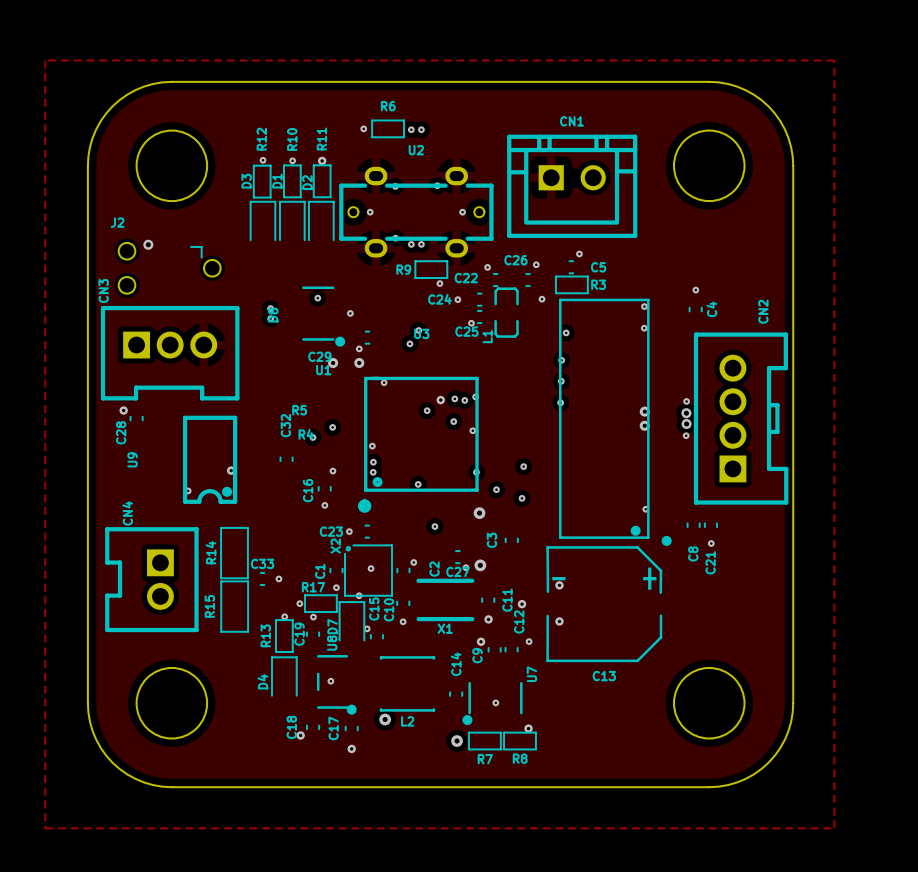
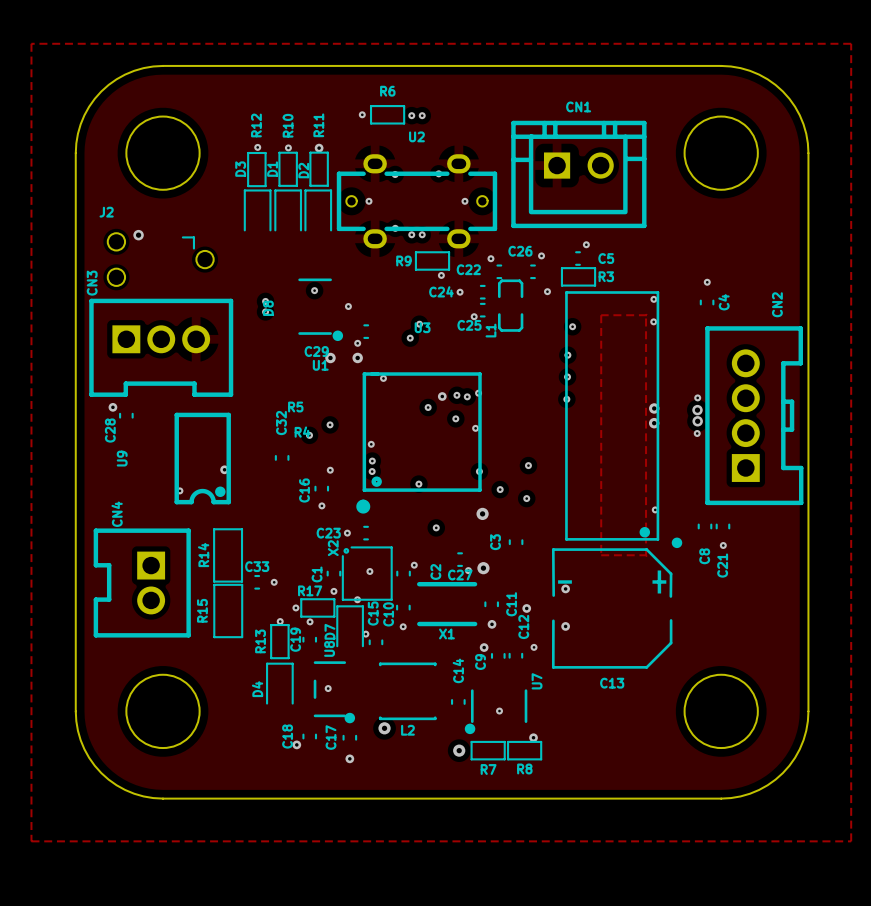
zone outline: none -> (646, 314) (646, 556) (646, 555) (601, 555) (601, 315) (646, 314)

